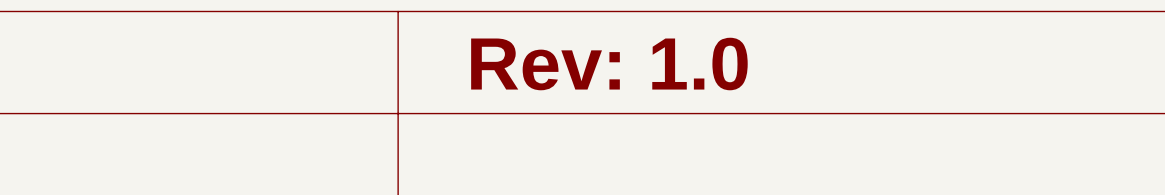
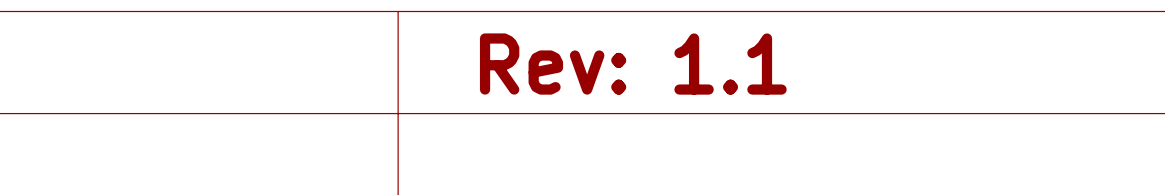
title block: Rev: 1.0 (609, 64) -> Rev: 1.1 (633, 64)

